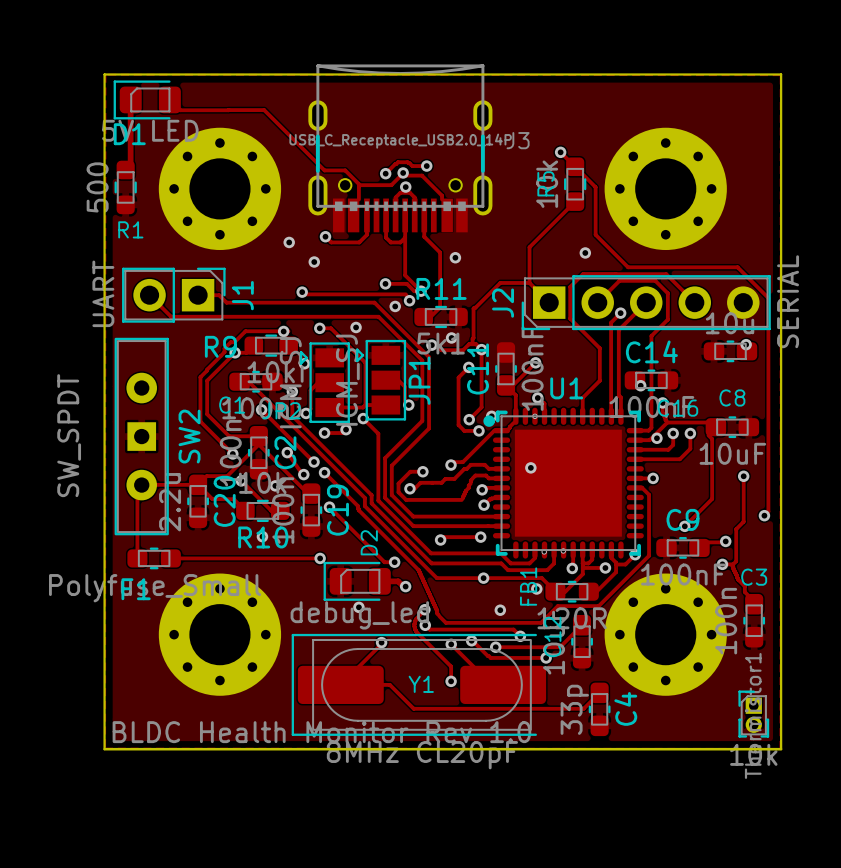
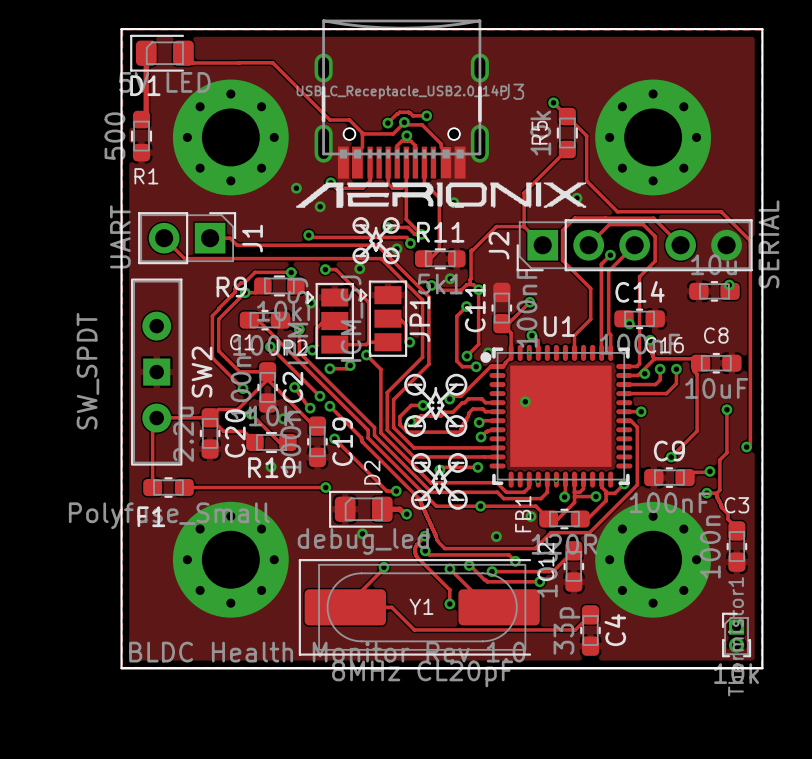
drawing: none -> [296, 182, 587, 265]
line: none -> (356, 225) (365, 225)
line: none -> (360, 225) (373, 237)
line: none -> (386, 225) (395, 225)
line: none -> (391, 225) (378, 237)
line: none -> (376, 228) (376, 231)
line: none -> (376, 231) (370, 240) (376, 250) (381, 240) (376, 231)
line: none -> (373, 243) (360, 255)
line: none -> (378, 243) (391, 255)
line: none -> (356, 255) (365, 255)
line: none -> (386, 255) (395, 255)
drawing: none -> [404, 373, 468, 510]
line: none -> (408, 384) (421, 384)
line: none -> (415, 384) (433, 402)
line: none -> (450, 384) (462, 384)
line: none -> (456, 384) (438, 402)
line: none -> (435, 388) (435, 392)
line: none -> (435, 392) (428, 405) (435, 418) (442, 405) (435, 392)
line: none -> (433, 408) (415, 426)
line: none -> (438, 408) (456, 426)
line: none -> (408, 426) (421, 426)
line: none -> (450, 426) (462, 426)
line: none -> (415, 462) (426, 462)
line: none -> (420, 462) (436, 478)
line: none -> (452, 462) (463, 462)
line: none -> (457, 462) (442, 478)
line: none -> (439, 466) (439, 469)
line: none -> (439, 469) (432, 481) (439, 493) (445, 481) (439, 469)
line: none -> (436, 484) (420, 499)
line: none -> (442, 484) (457, 499)
line: none -> (415, 499) (426, 499)
line: none -> (452, 499) (463, 499)

